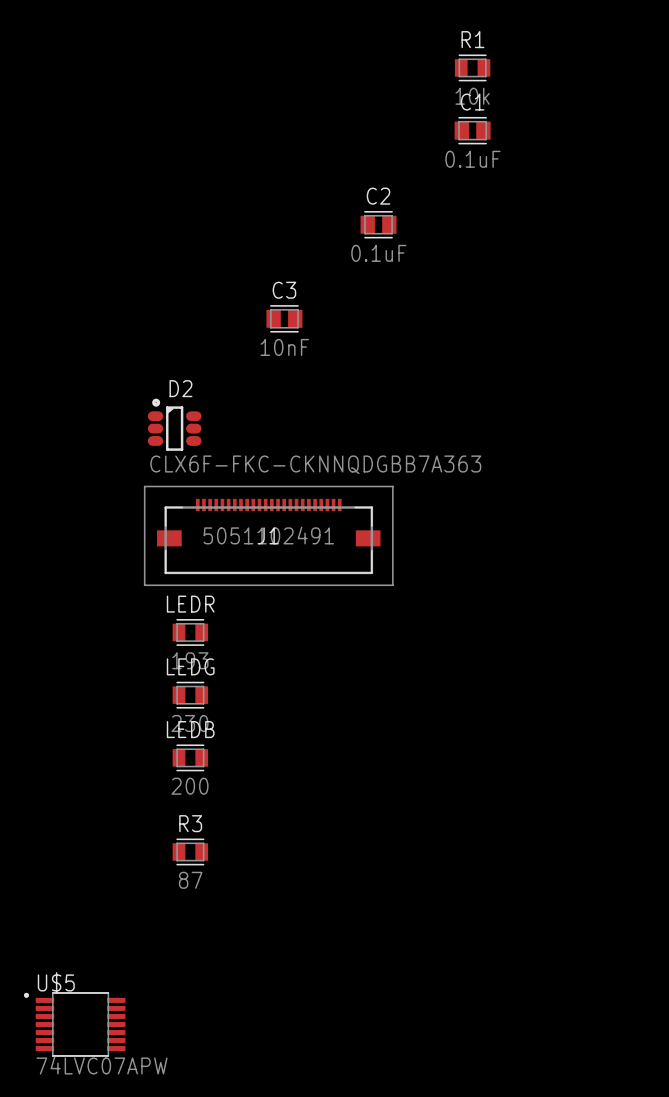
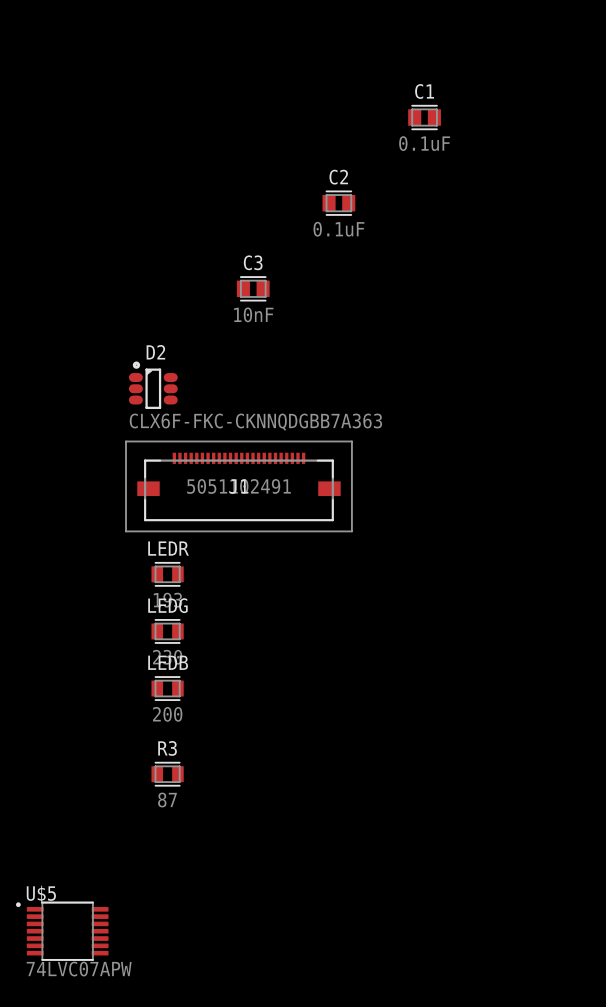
R1: 10k (472, 67) -> none

